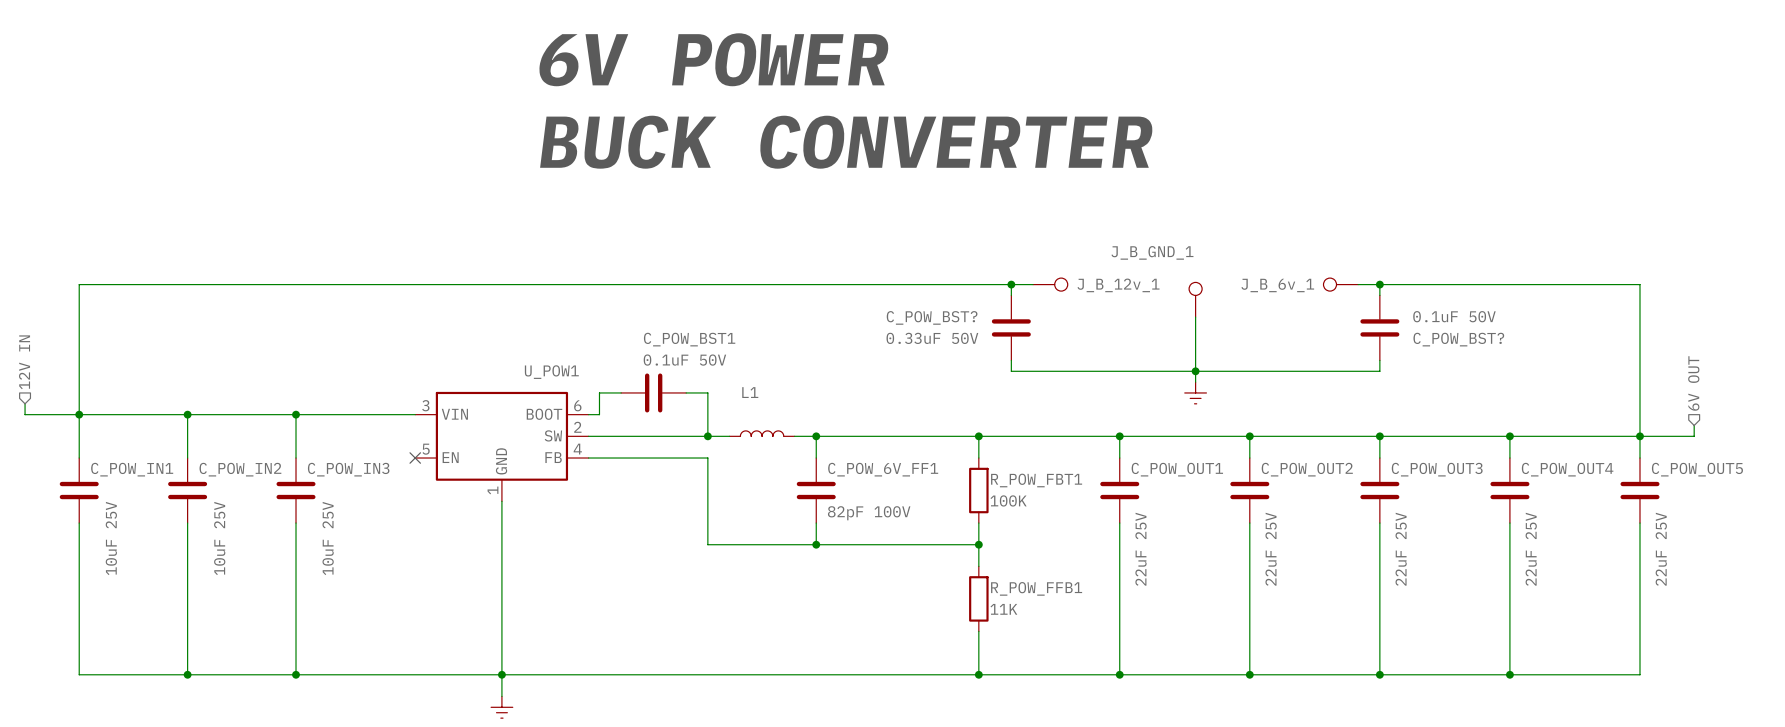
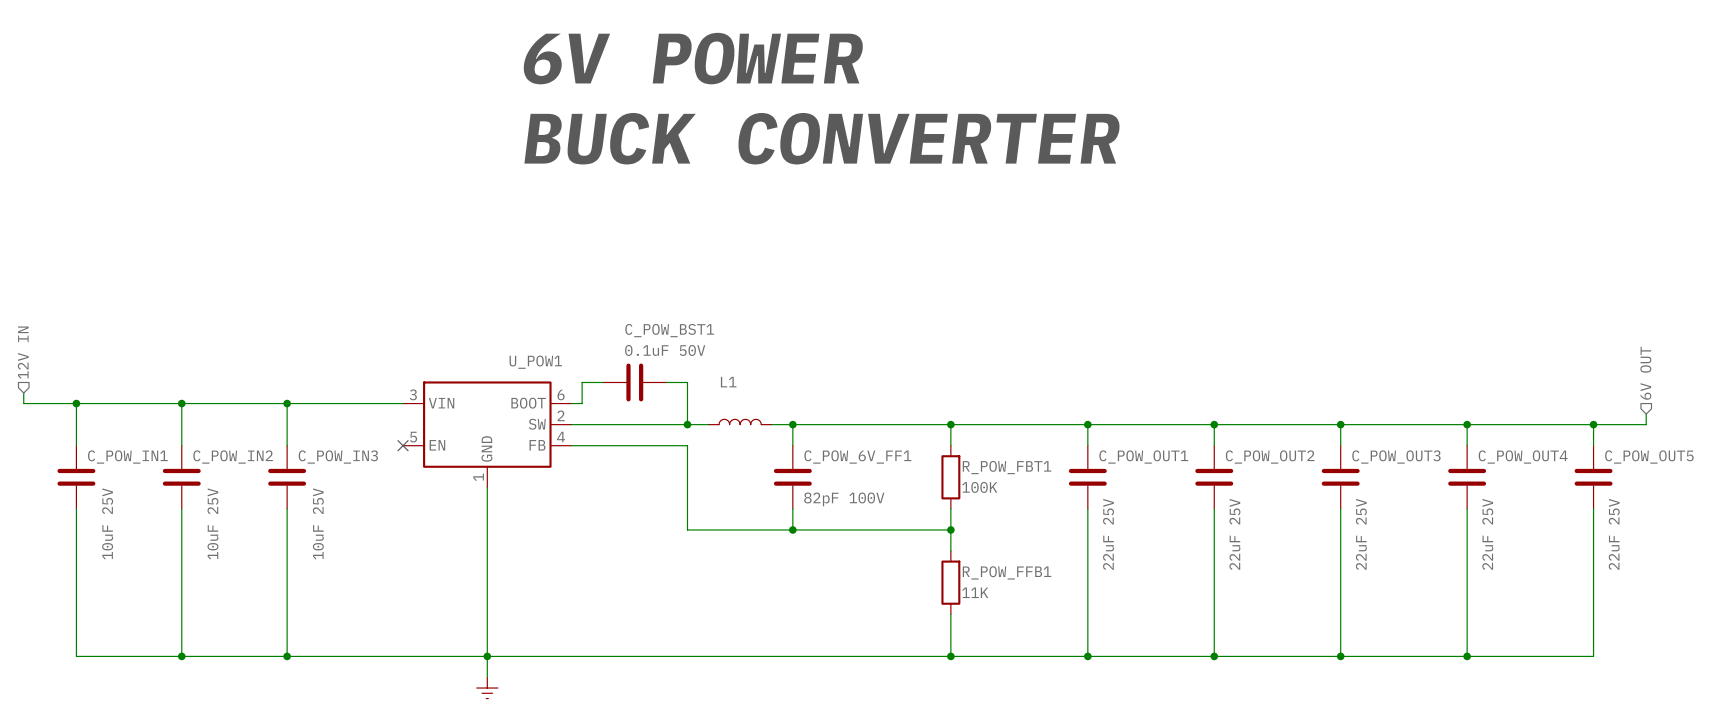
wire: (1011, 284) (1011, 295) -> none
junction: (1011, 284) -> none
wire: (1033, 284) (79, 284) (79, 414) -> none
J_B_12v_1: (1050, 284) -> none
J_B_6v_1: (1340, 284) -> none
wire: (1358, 284) (1639, 284) (1639, 436) -> none
wire: (1379, 284) (1379, 295) -> none
junction: (1379, 284) -> none
J_B_GND_1: (1195, 299) -> none
wire: (1195, 317) (1195, 382) -> none
C_POW_BST?: 0.33uF 50V (1011, 327) -> none
C_POW_BST?: 0.1uF 50V (1379, 327) -> none
wire: (1011, 360) (1011, 371) (1379, 371) (1379, 360) -> none
junction: (1195, 371) -> none
power symbol: (1195, 392) -> none

